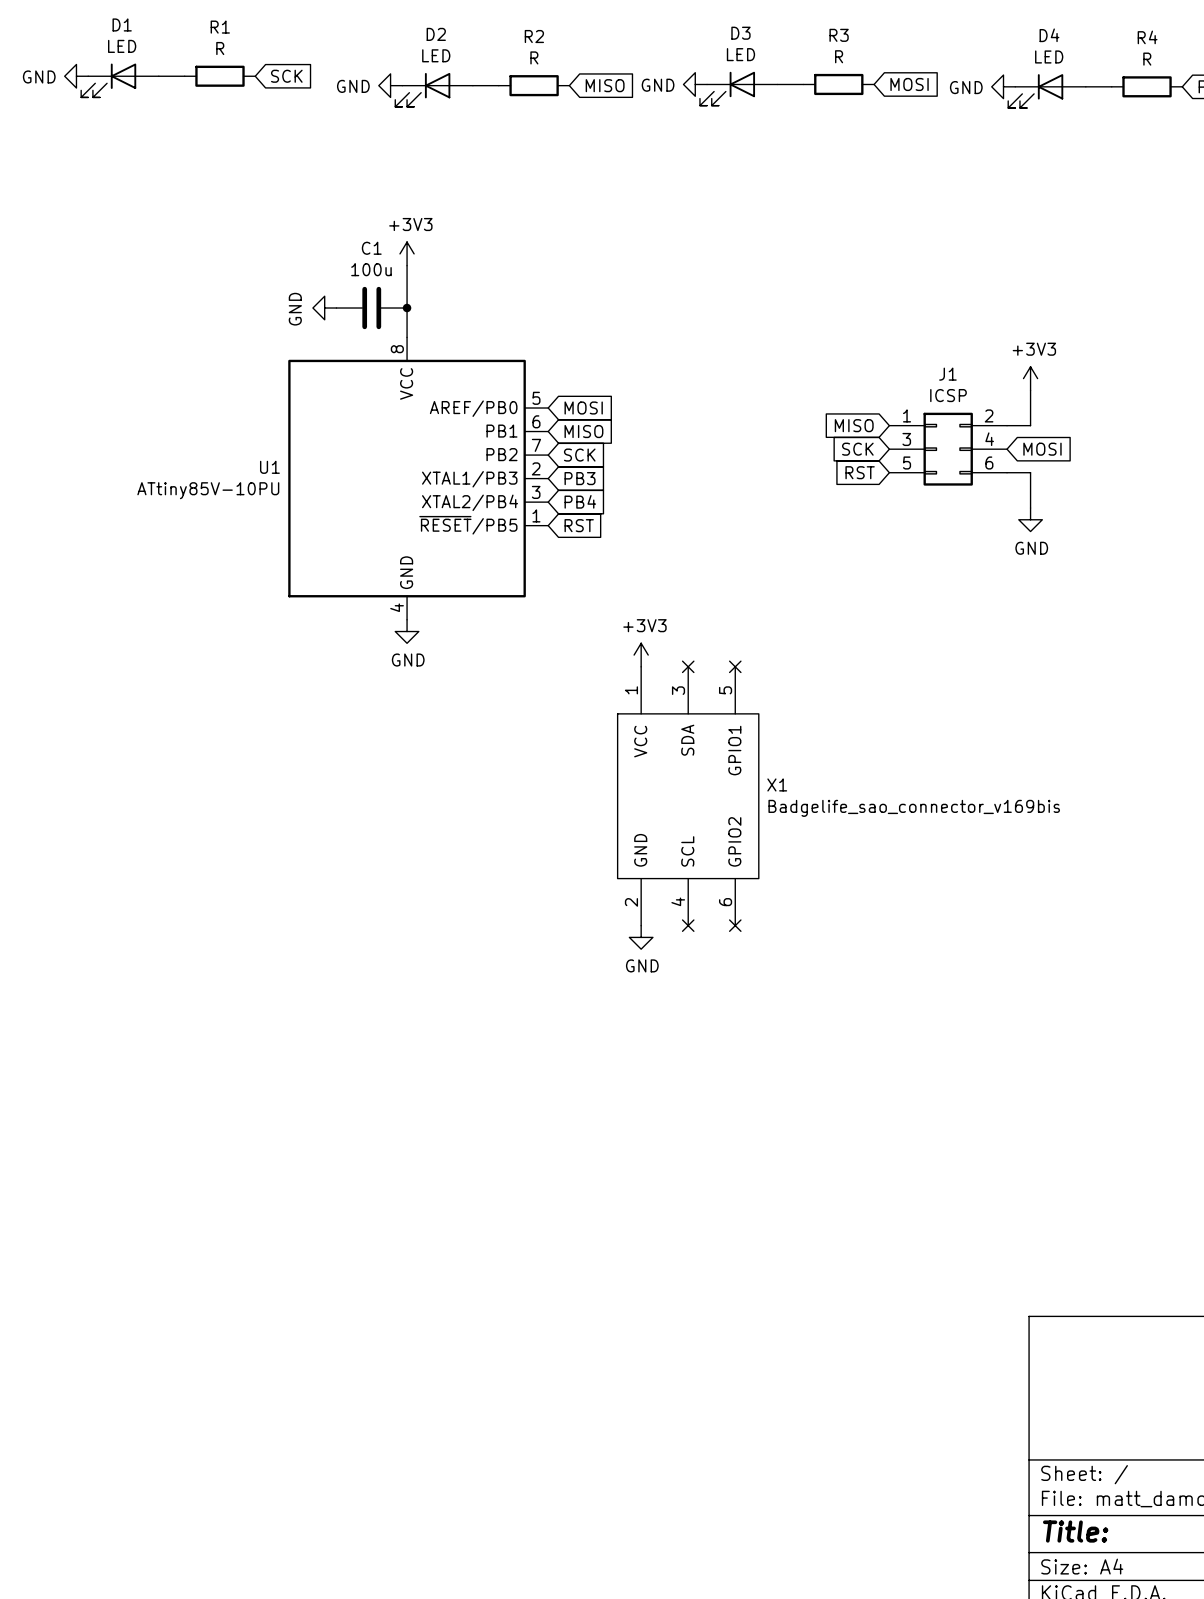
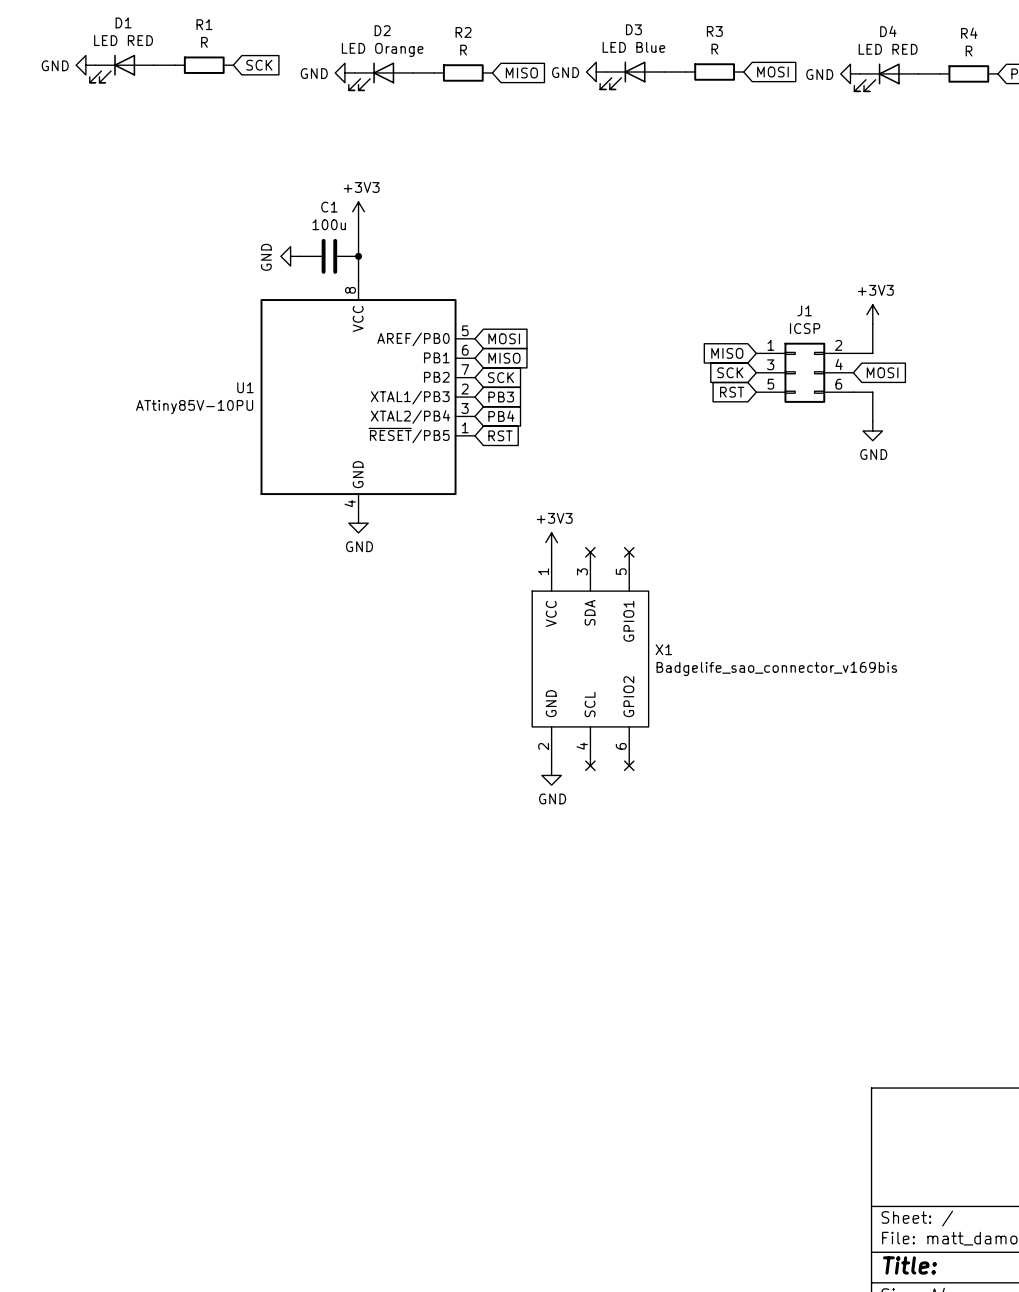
D1 value: LED (122, 46) -> LED RED (123, 40)
D3 value: LED (740, 54) -> LED Blue (633, 47)
D2 value: LED (436, 55) -> LED Orange (382, 49)
D4 value: LED (1049, 56) -> LED RED (888, 49)

